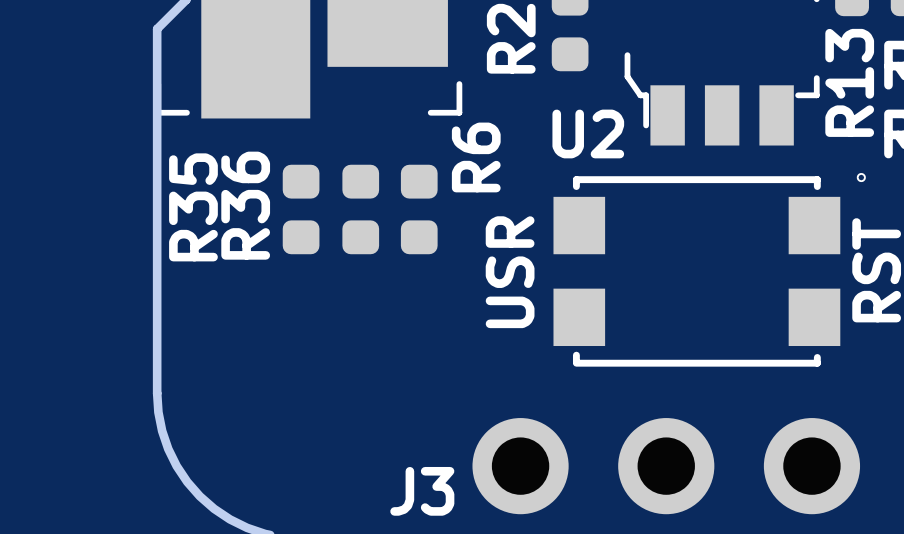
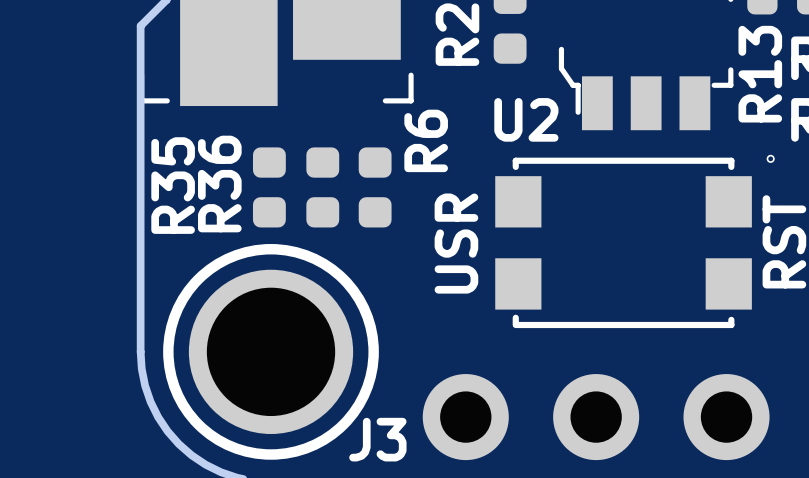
part: none -> (271, 351)

